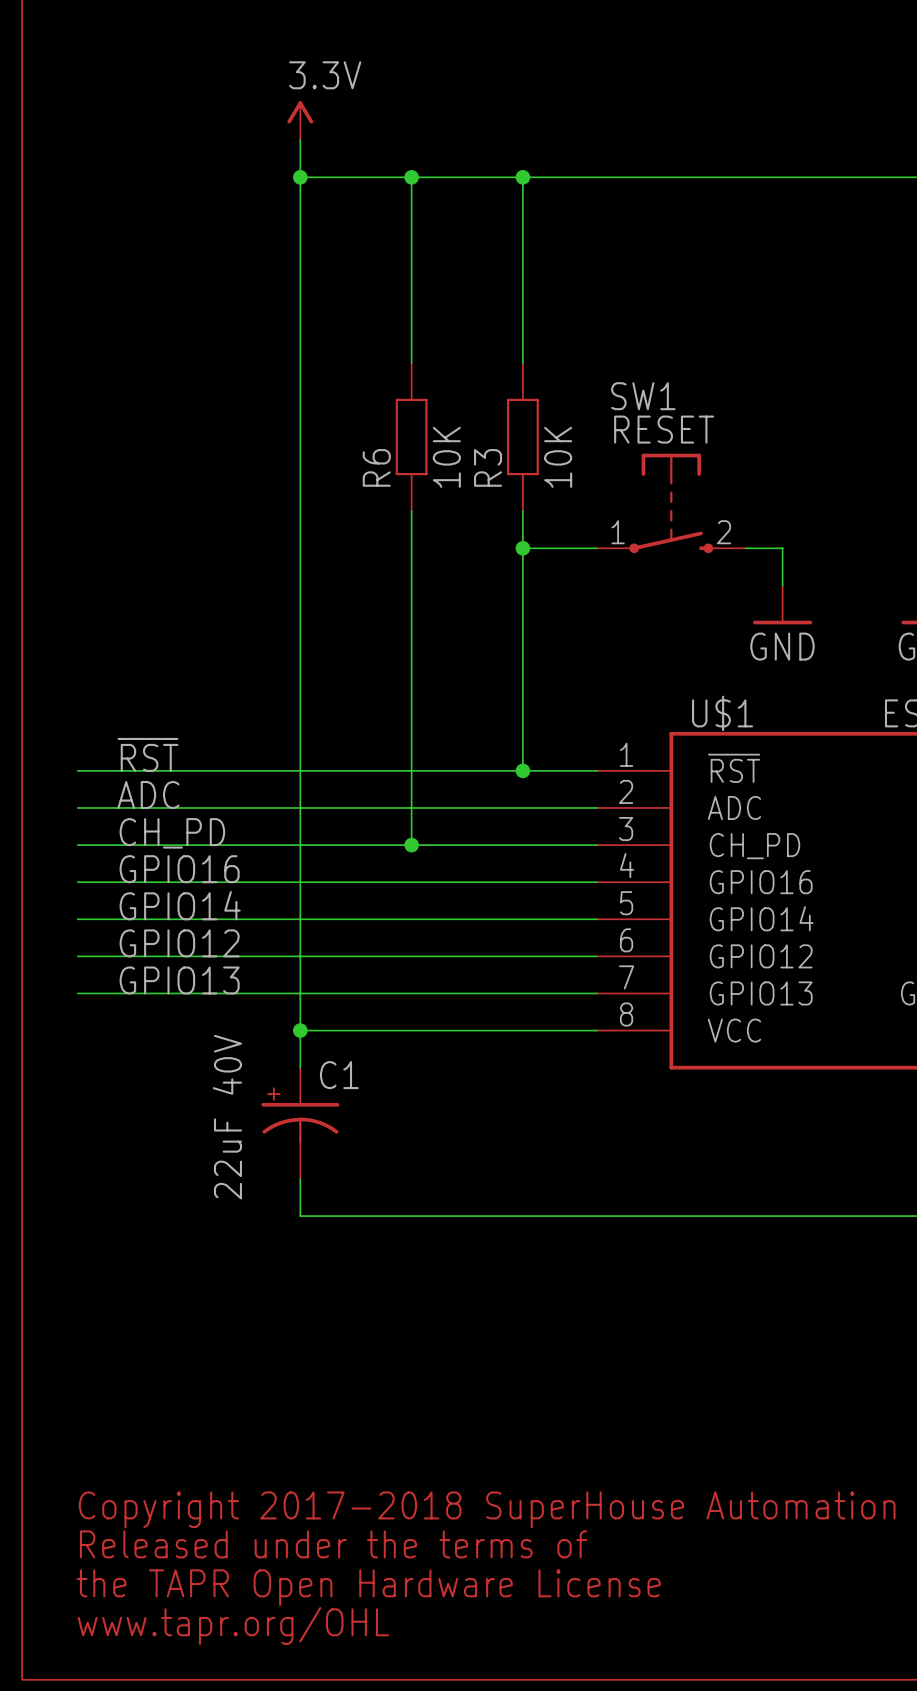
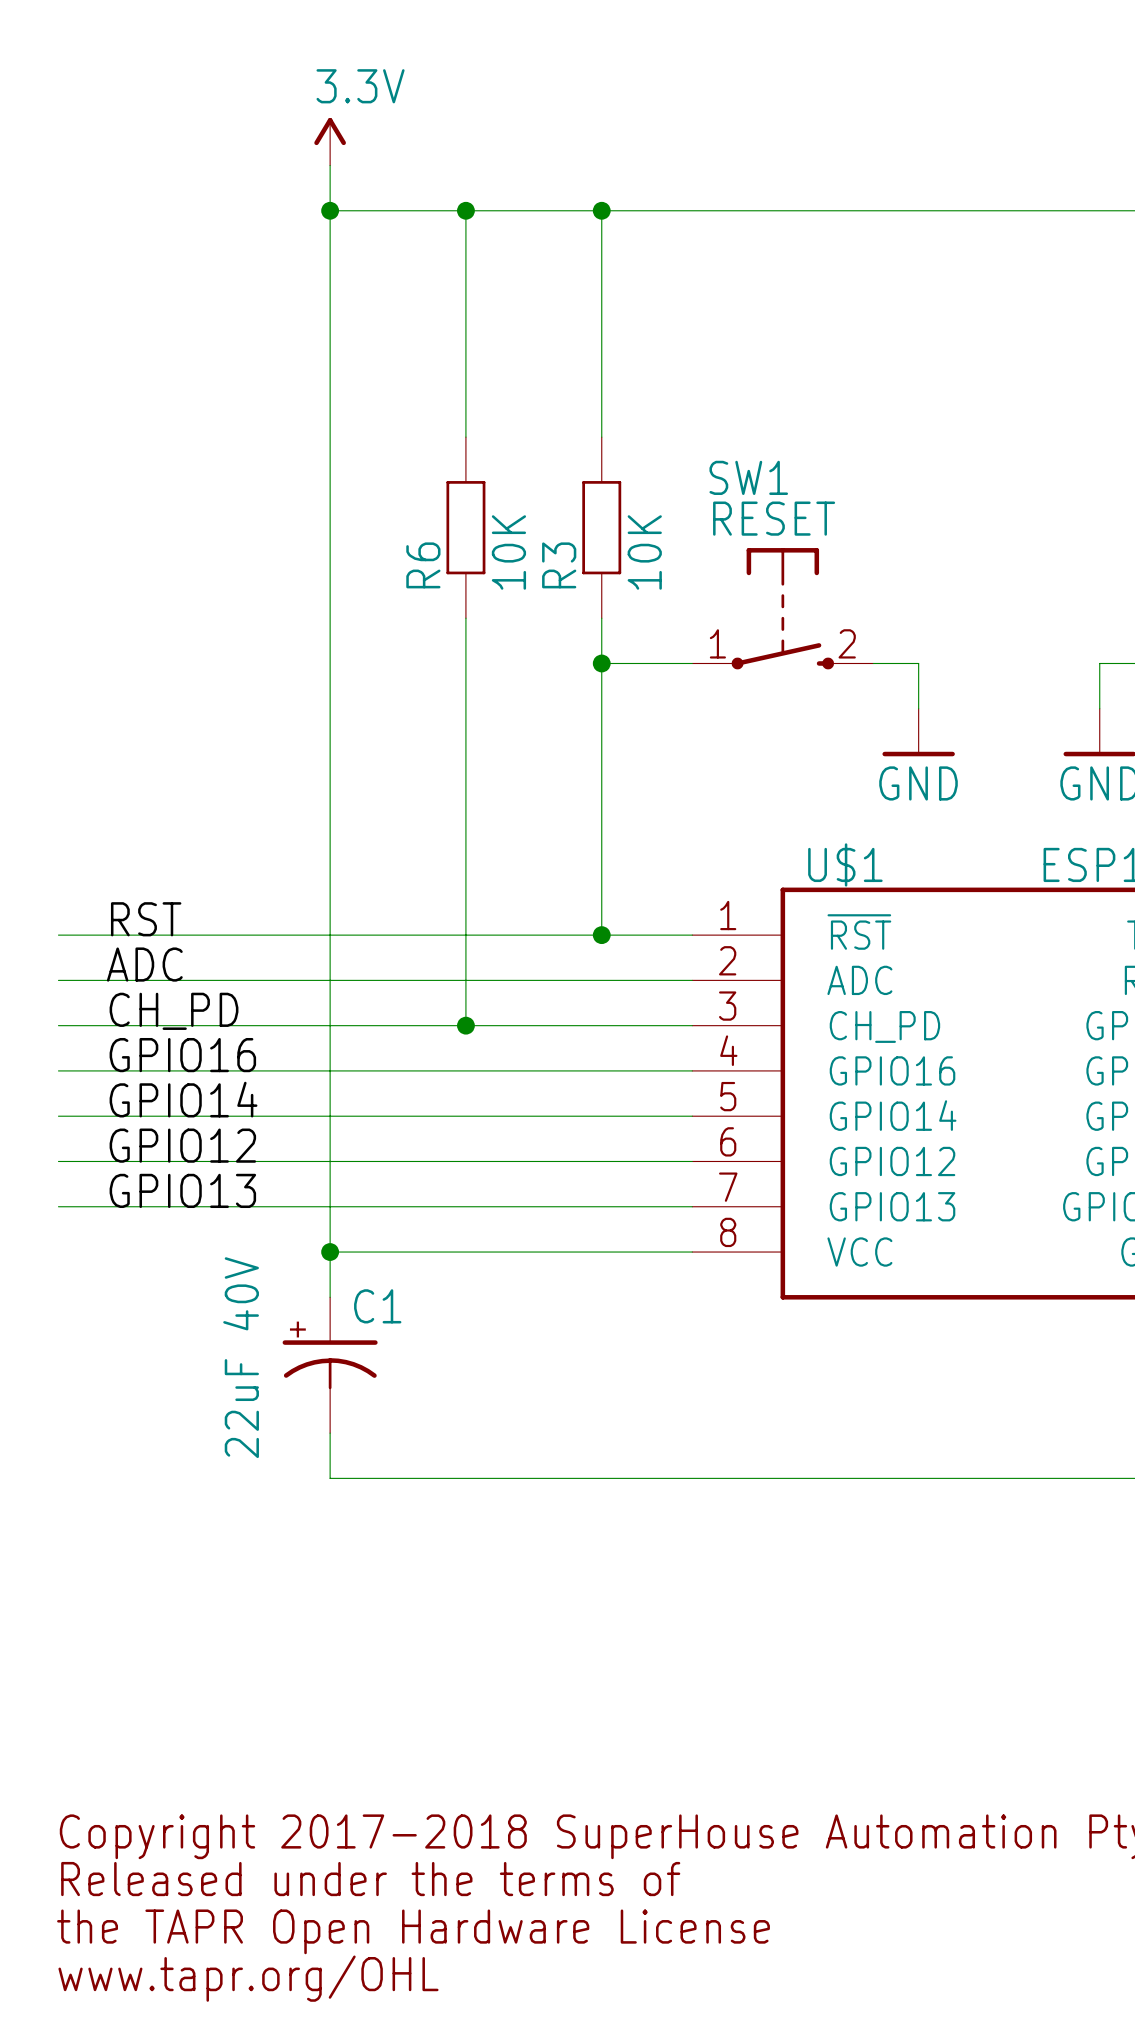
label: ~{RST} (147, 754) -> RST (146, 919)

